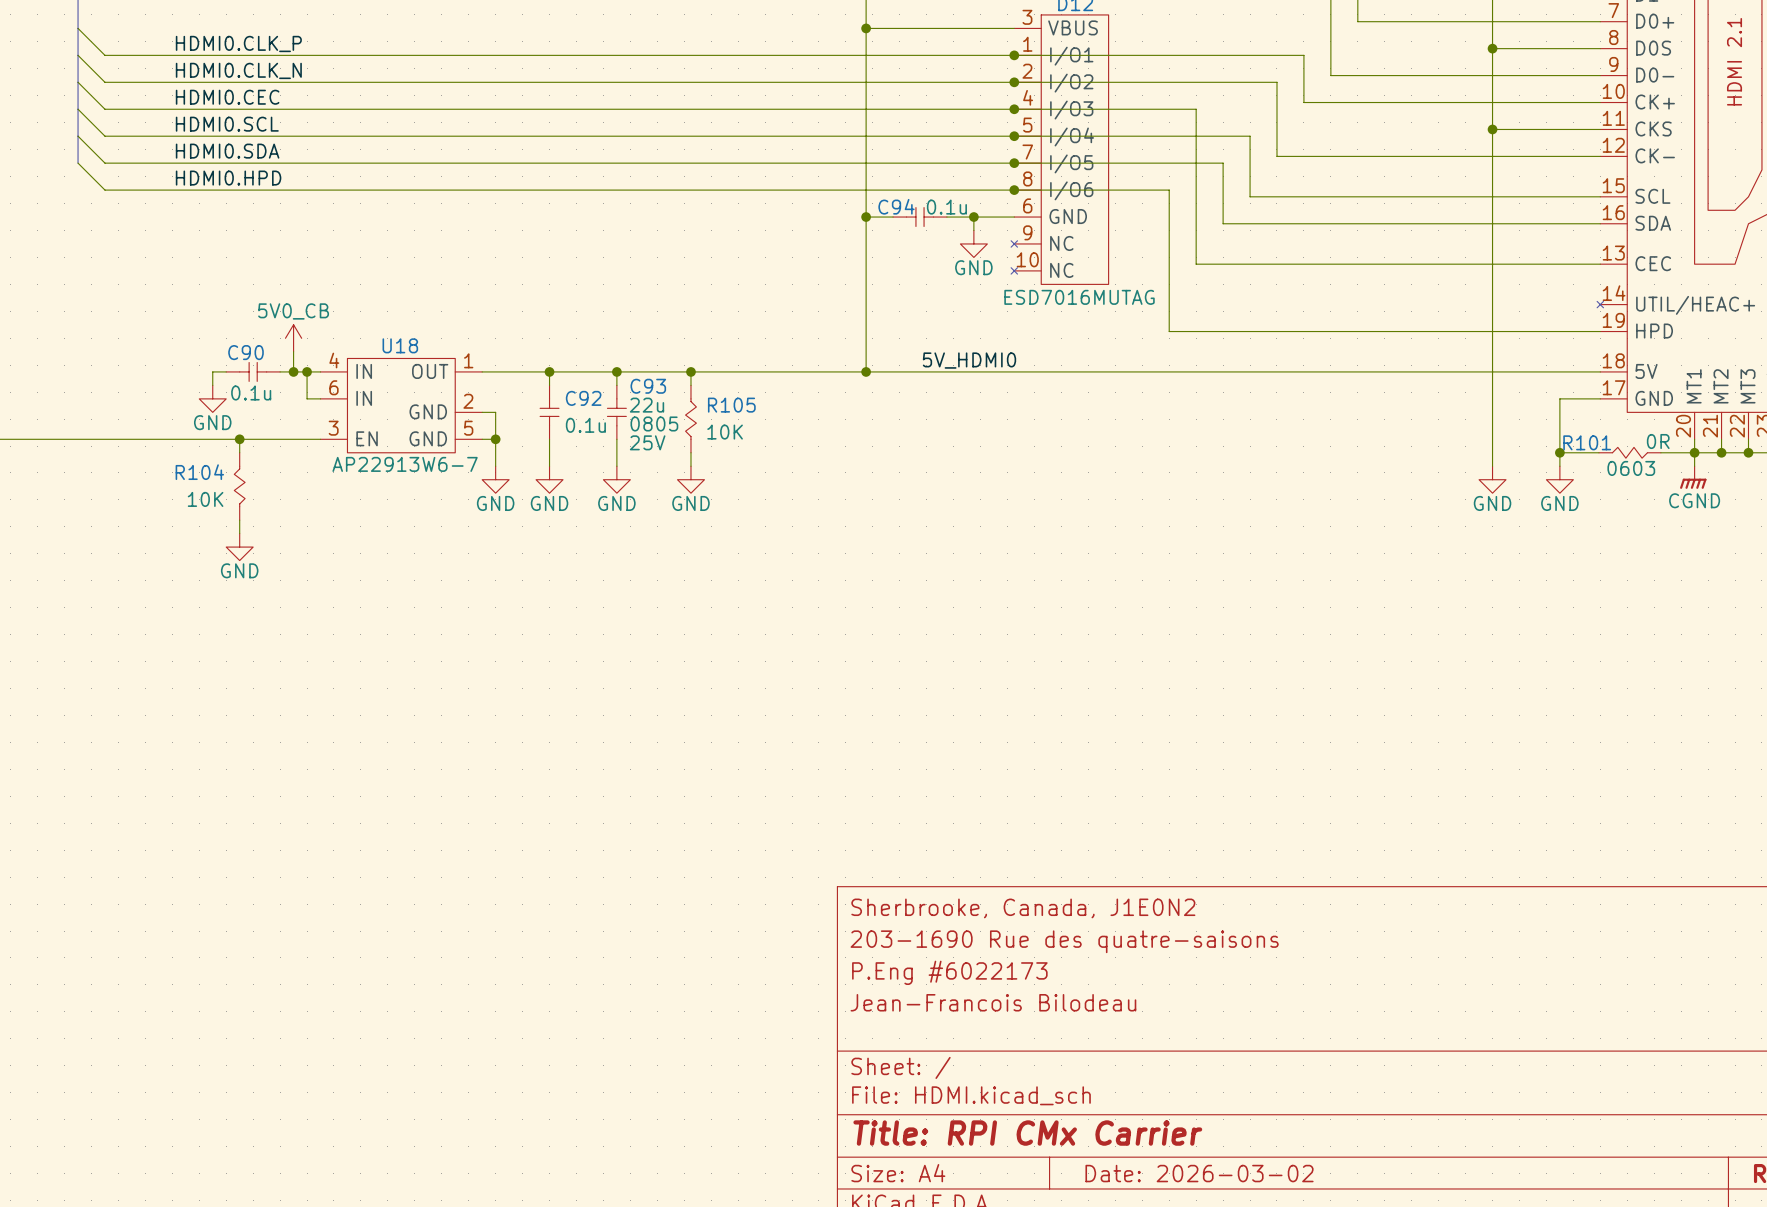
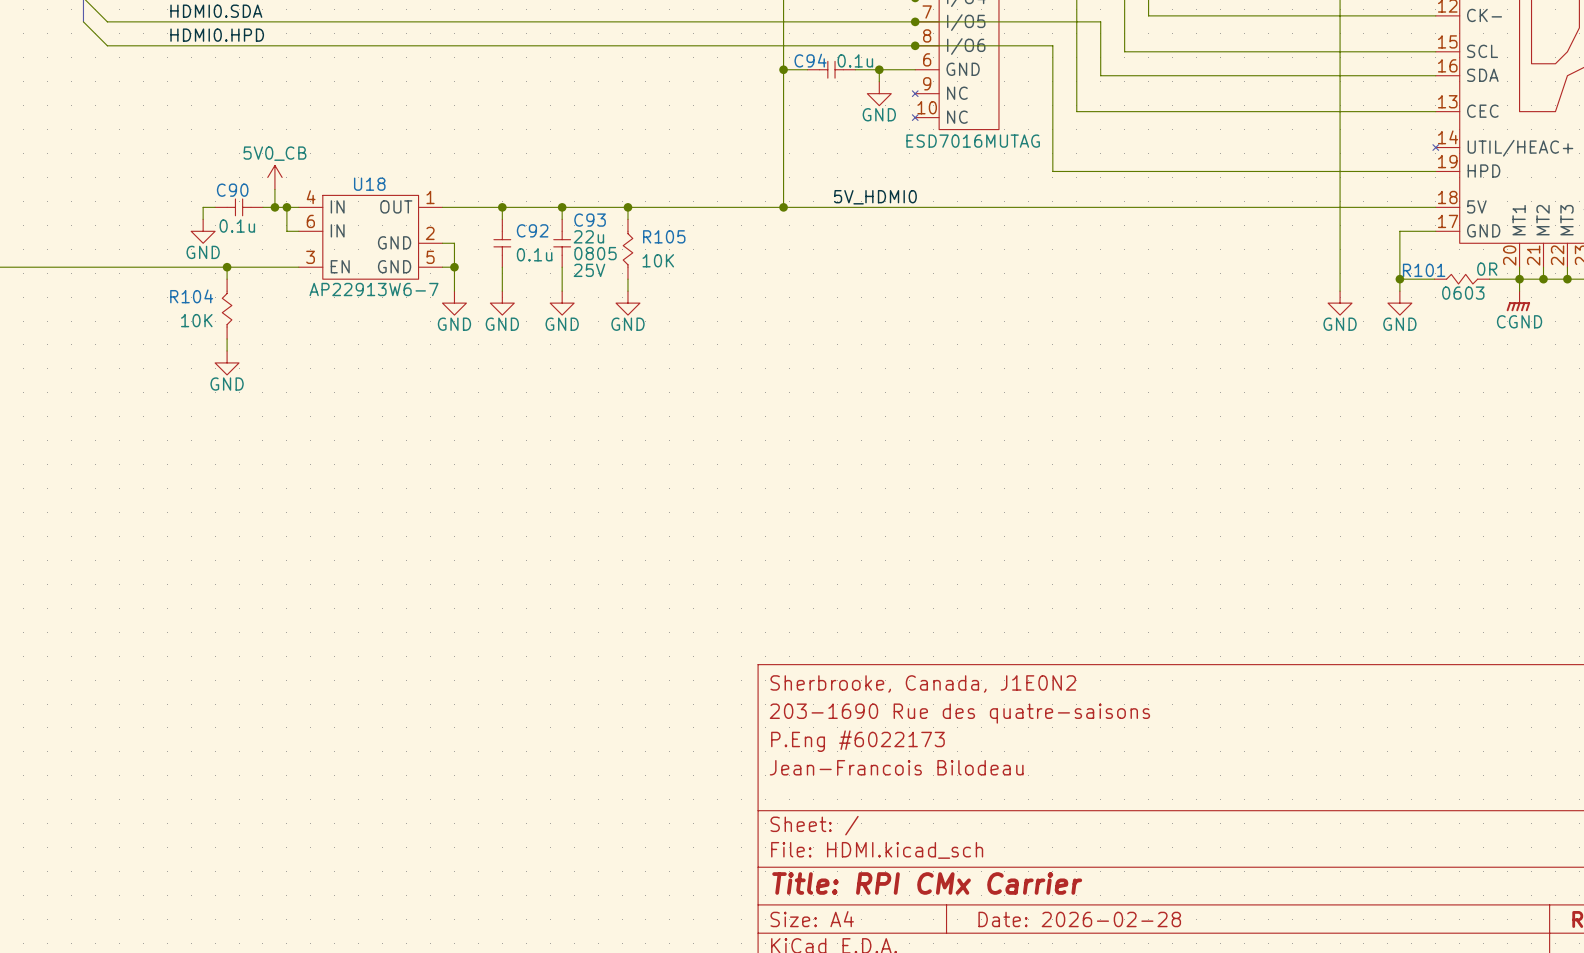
title block: Date: 2026-03-02 (1199, 1173) -> Date: 2026-02-28 (1079, 919)

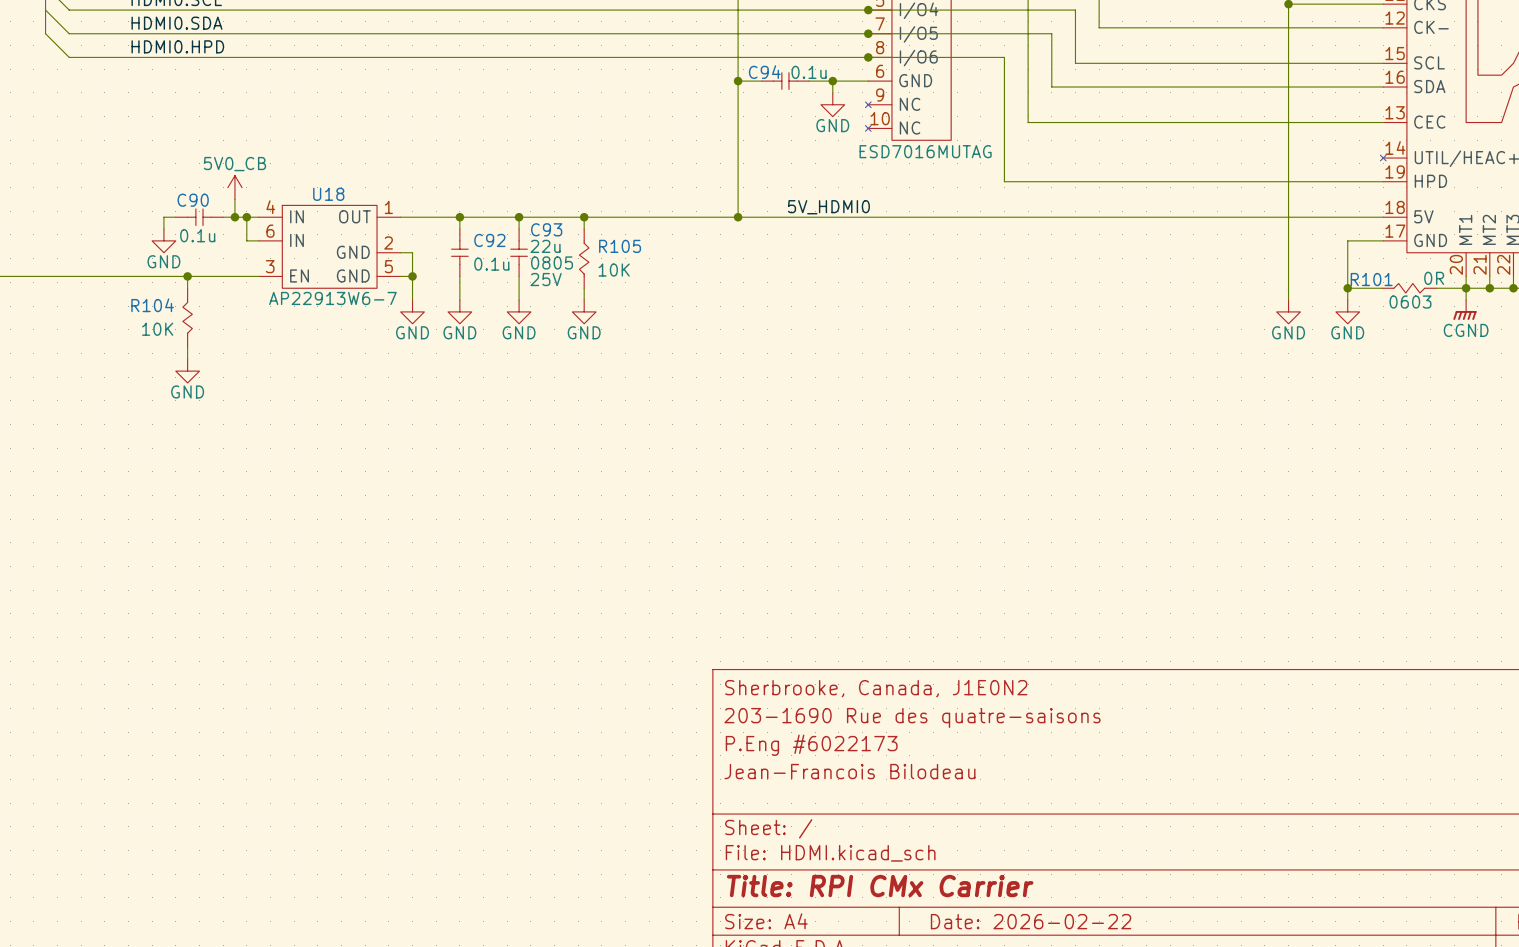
title block: Date: 2026-02-28 (1079, 919) -> Date: 2026-02-22 (1031, 921)

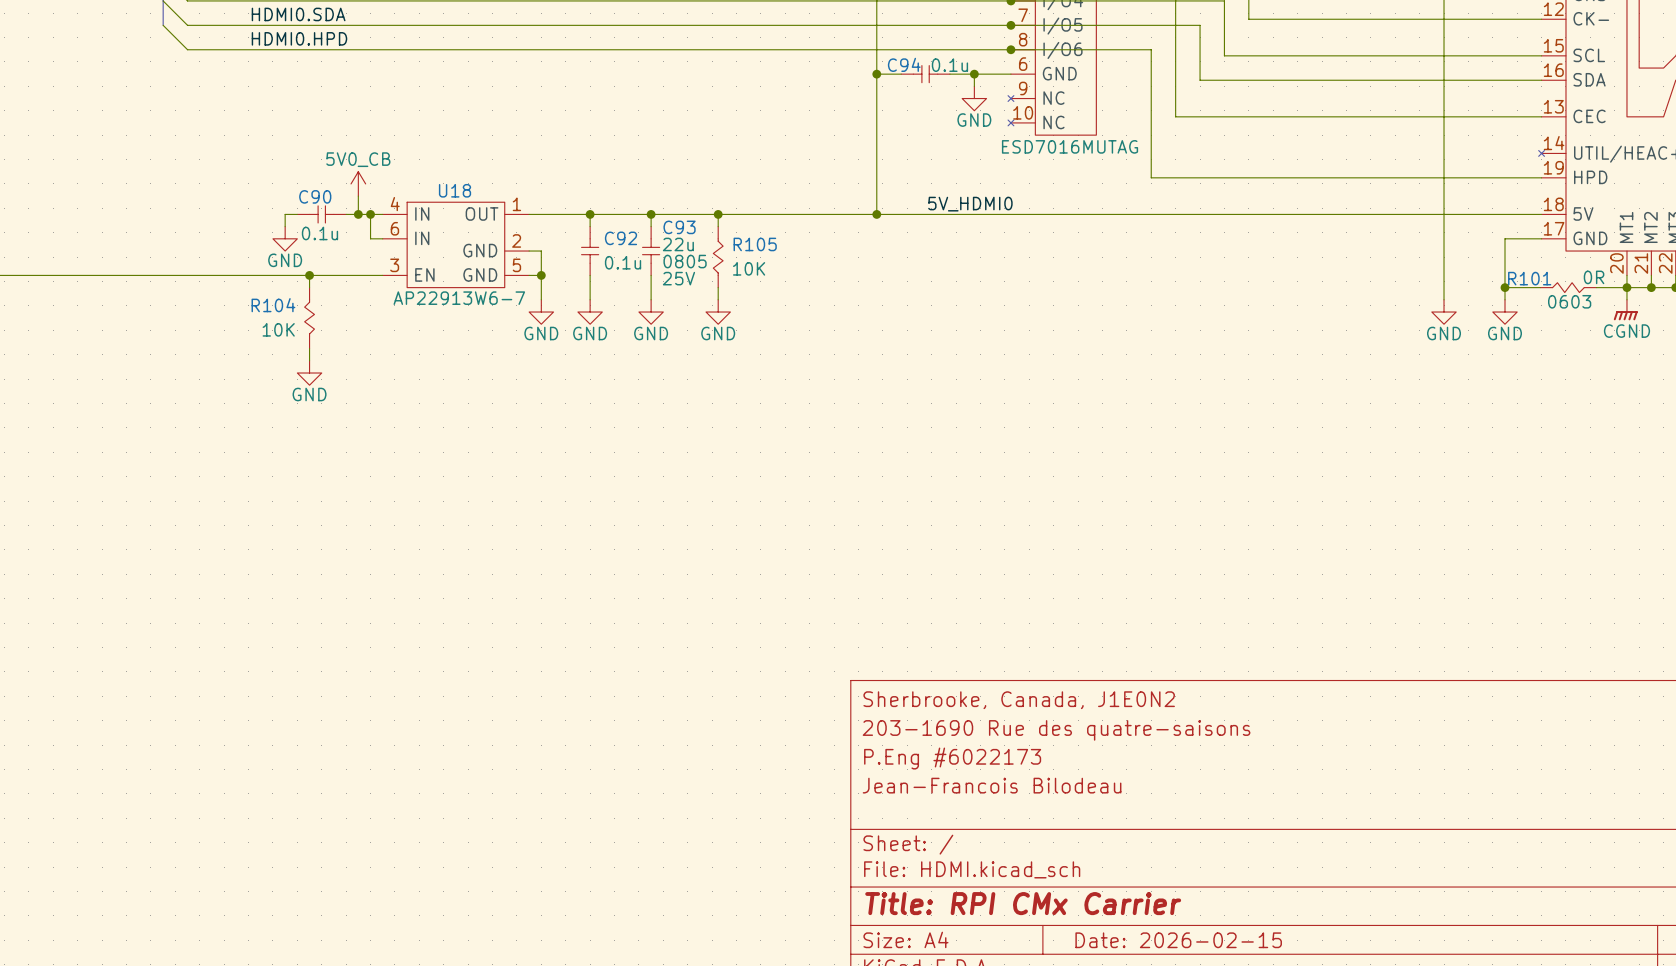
title block: Date: 2026-02-22 (1031, 921) -> Date: 2026-02-15 (1178, 940)

